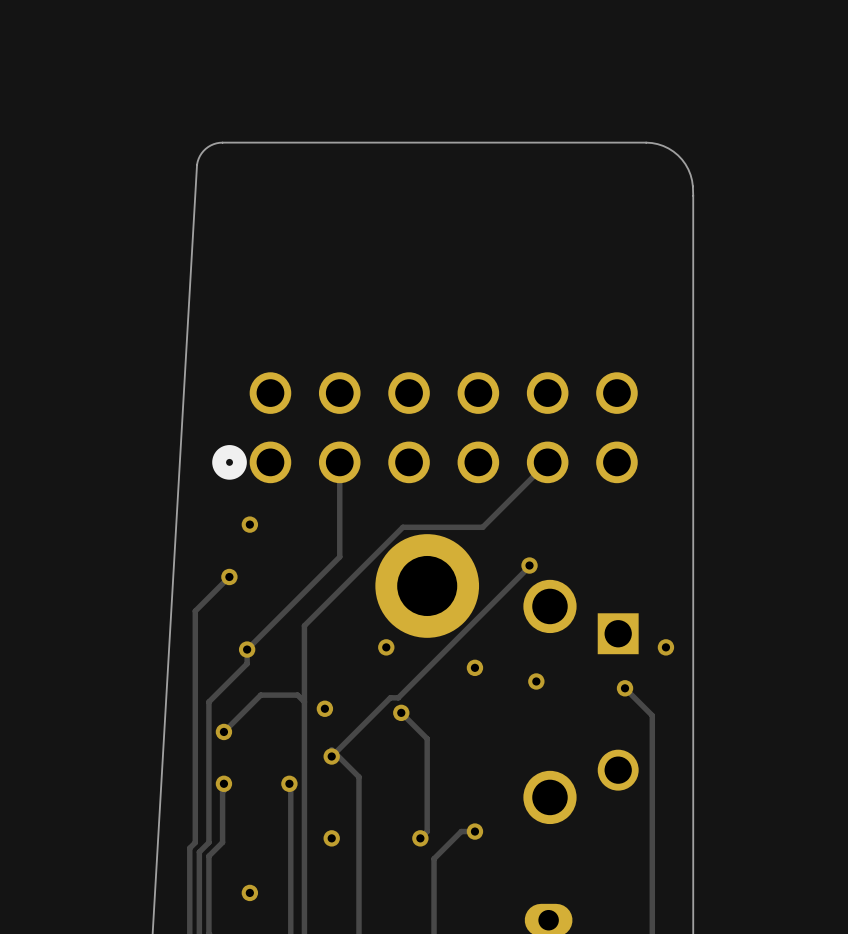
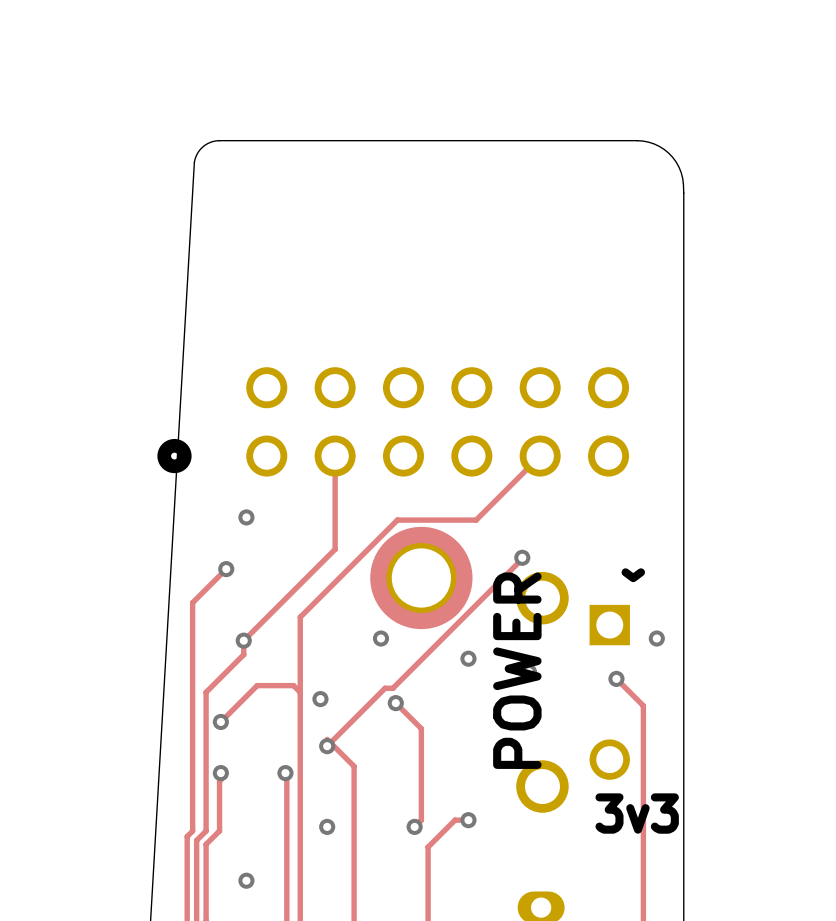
part footprint: [212, 372, 638, 484] -> [157, 367, 630, 477]
text: none -> ^ (633, 575)
text: none -> POWER (517, 670)
text: none -> 3v3 (637, 813)

